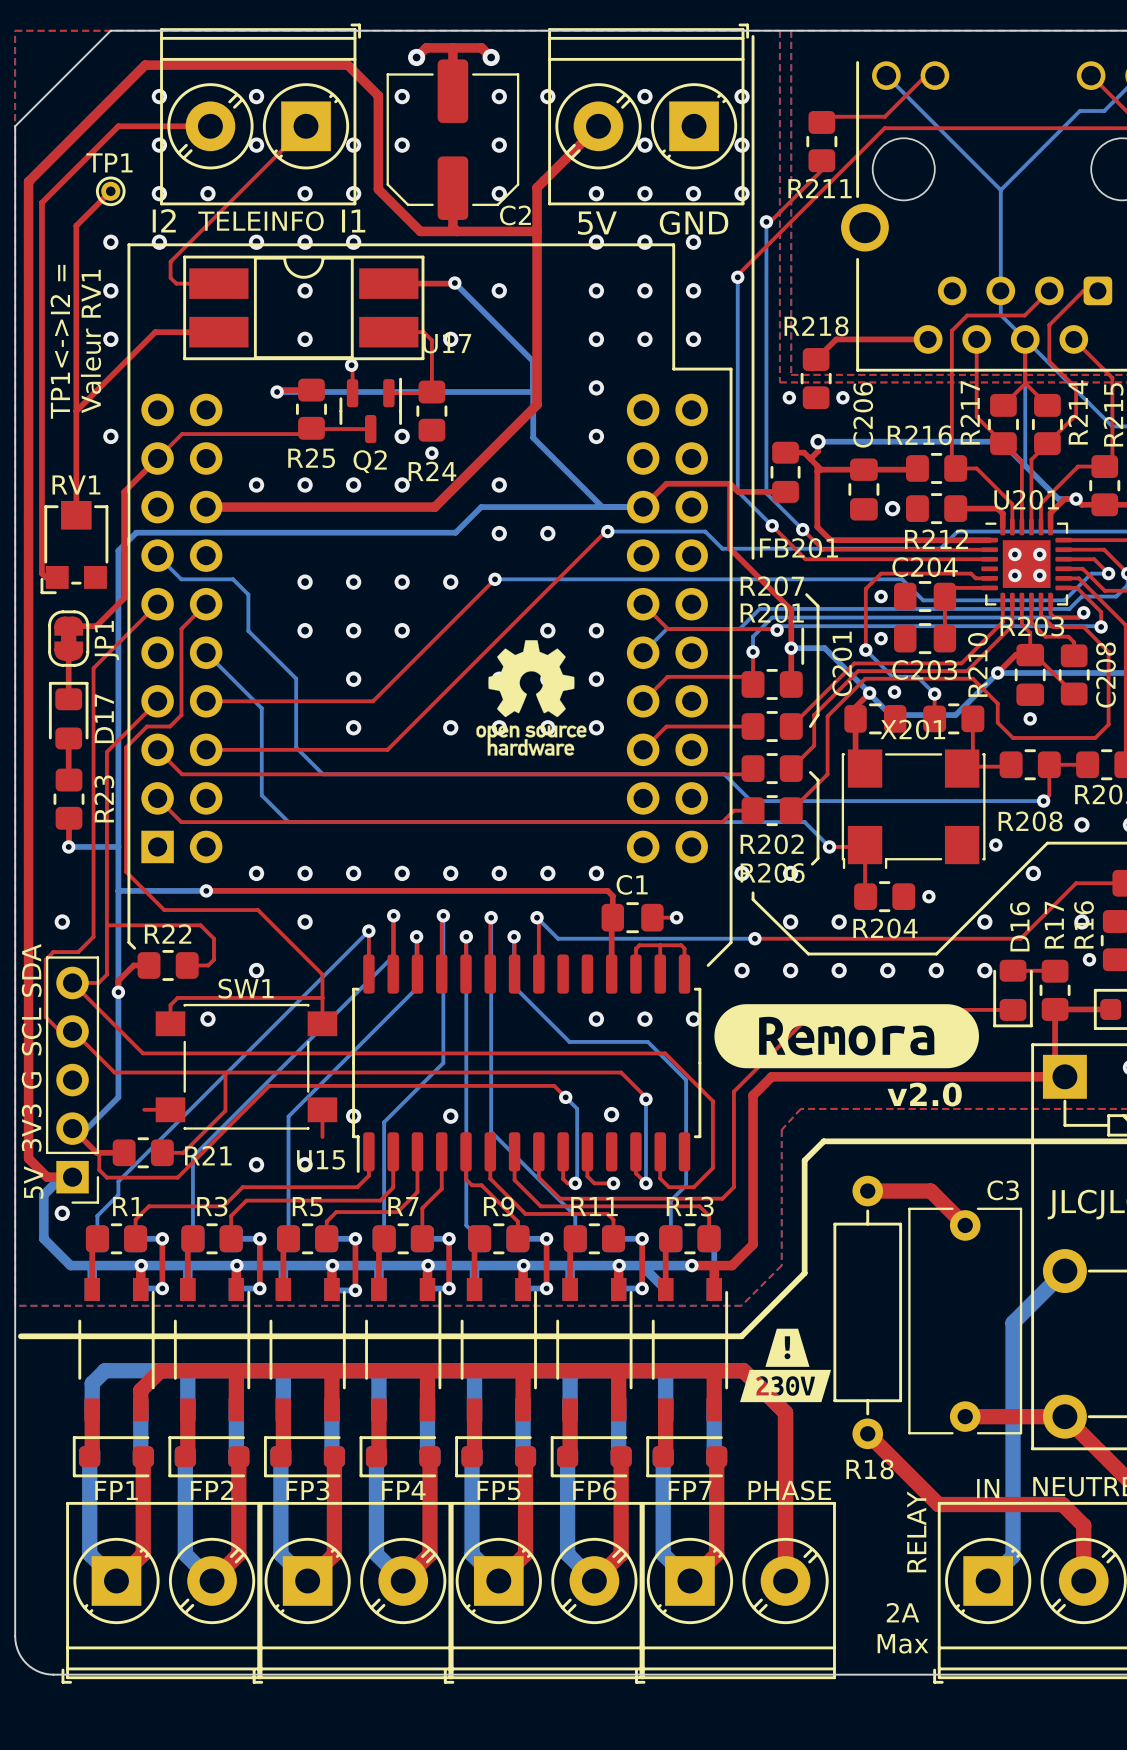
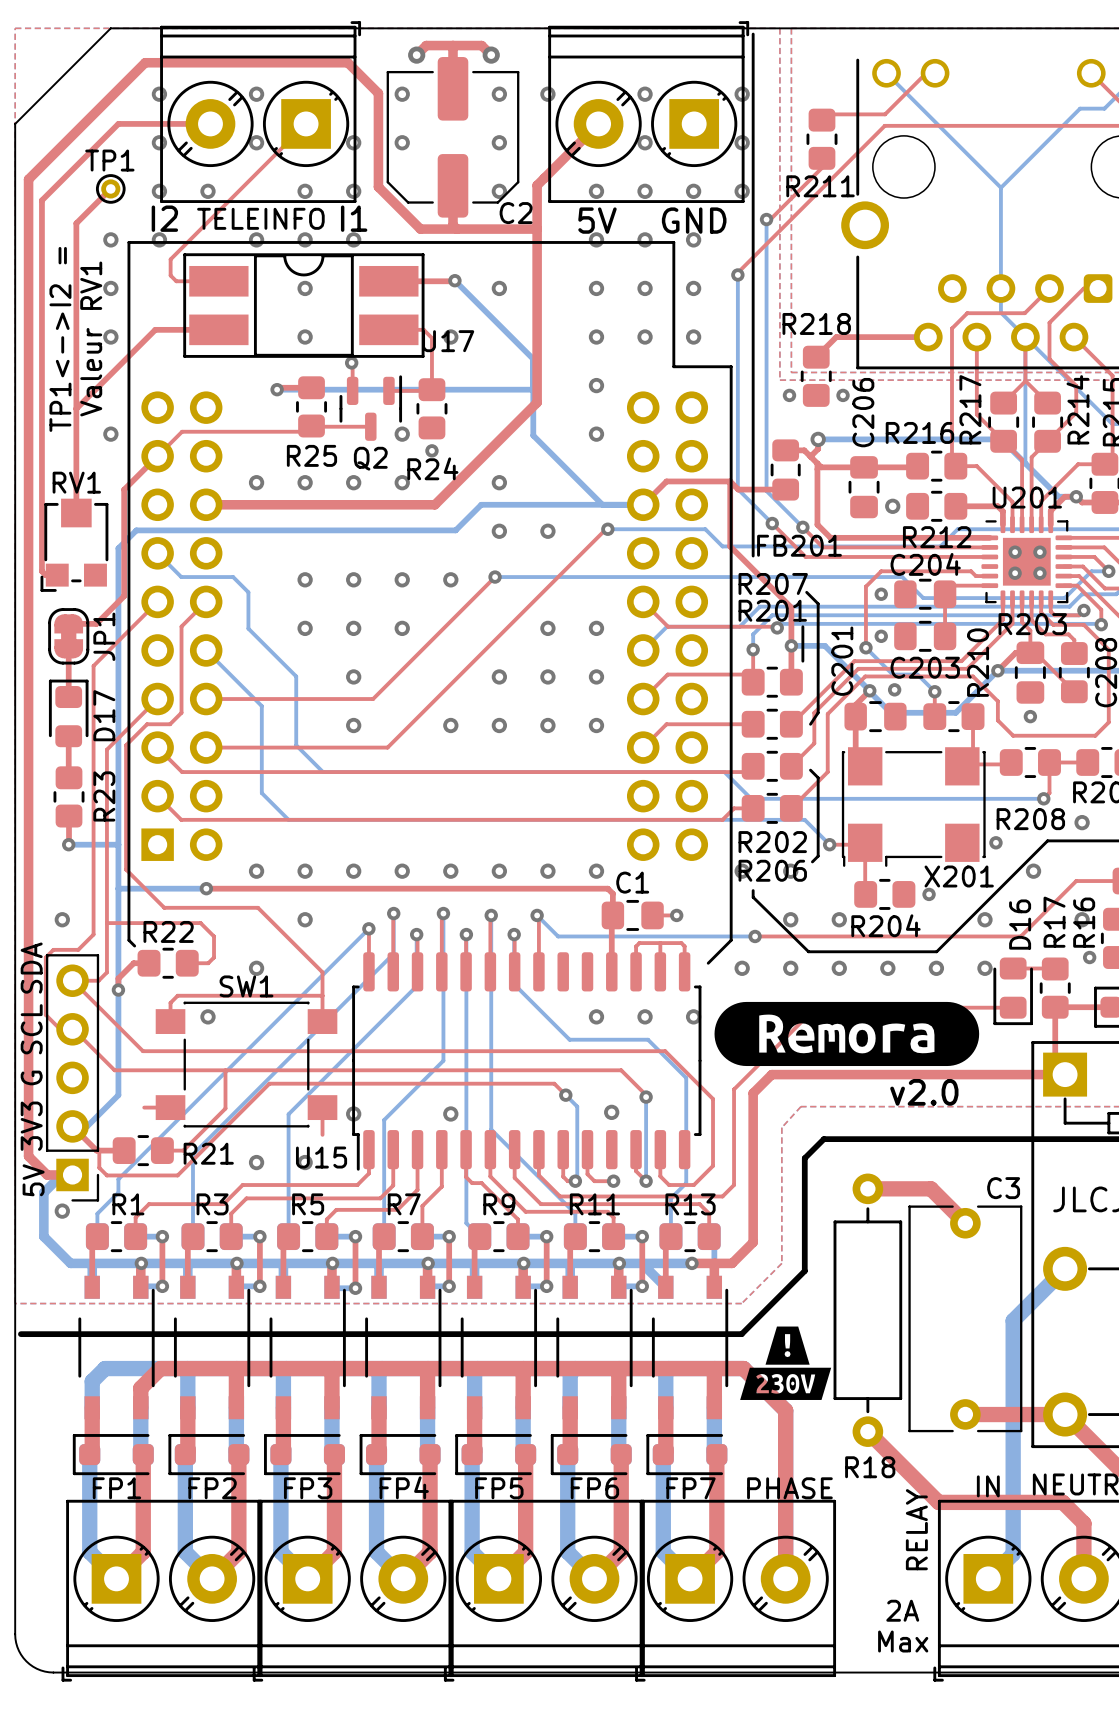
drawing: [476, 640, 587, 756] -> none
X201 name position: X201 (912, 729) -> X201 (959, 876)

